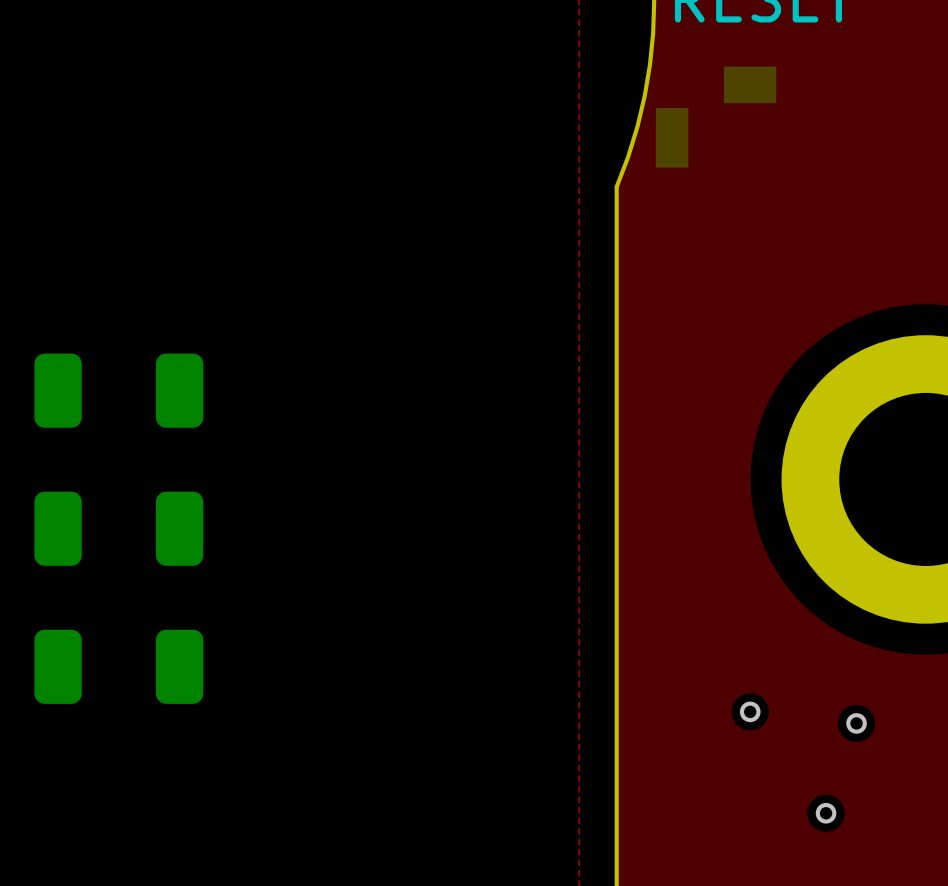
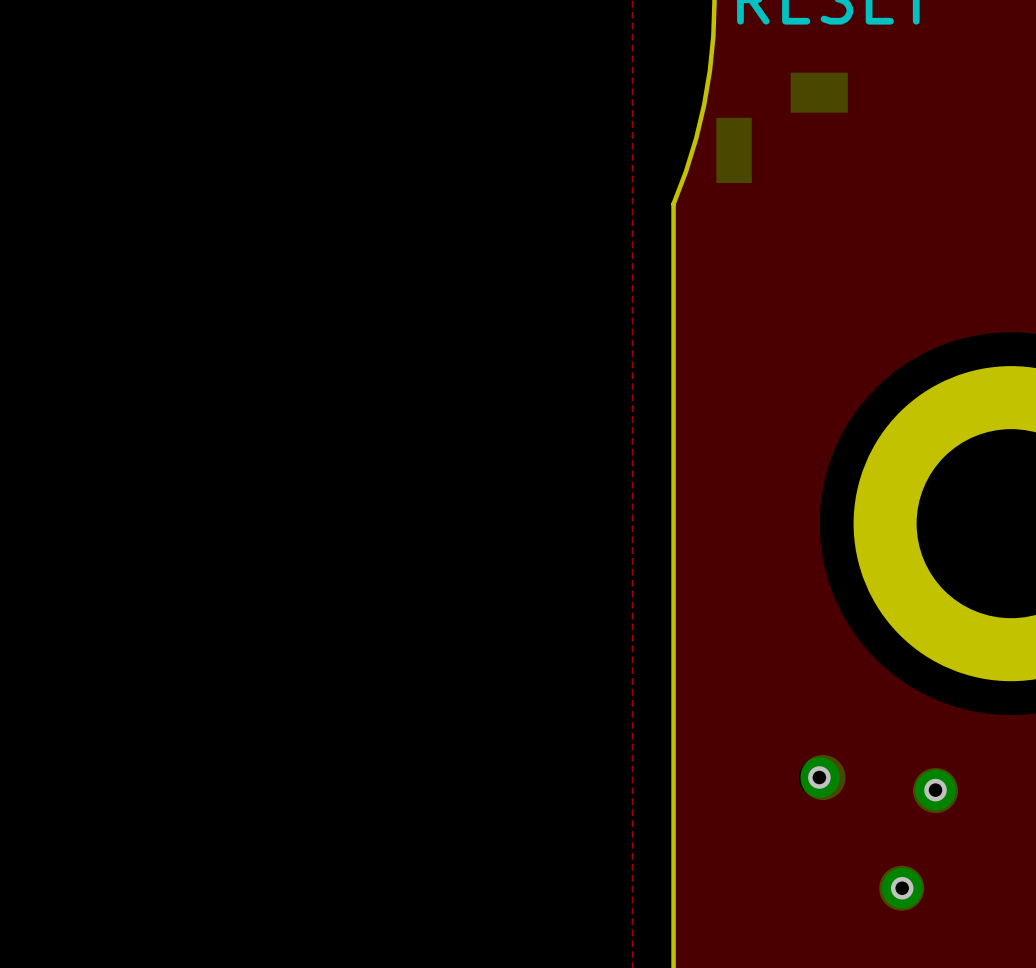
part: (118, 390) -> none
part: (118, 528) -> none
part: (118, 666) -> none
part: none -> (822, 777)
part: none -> (935, 790)
part: none -> (901, 888)

